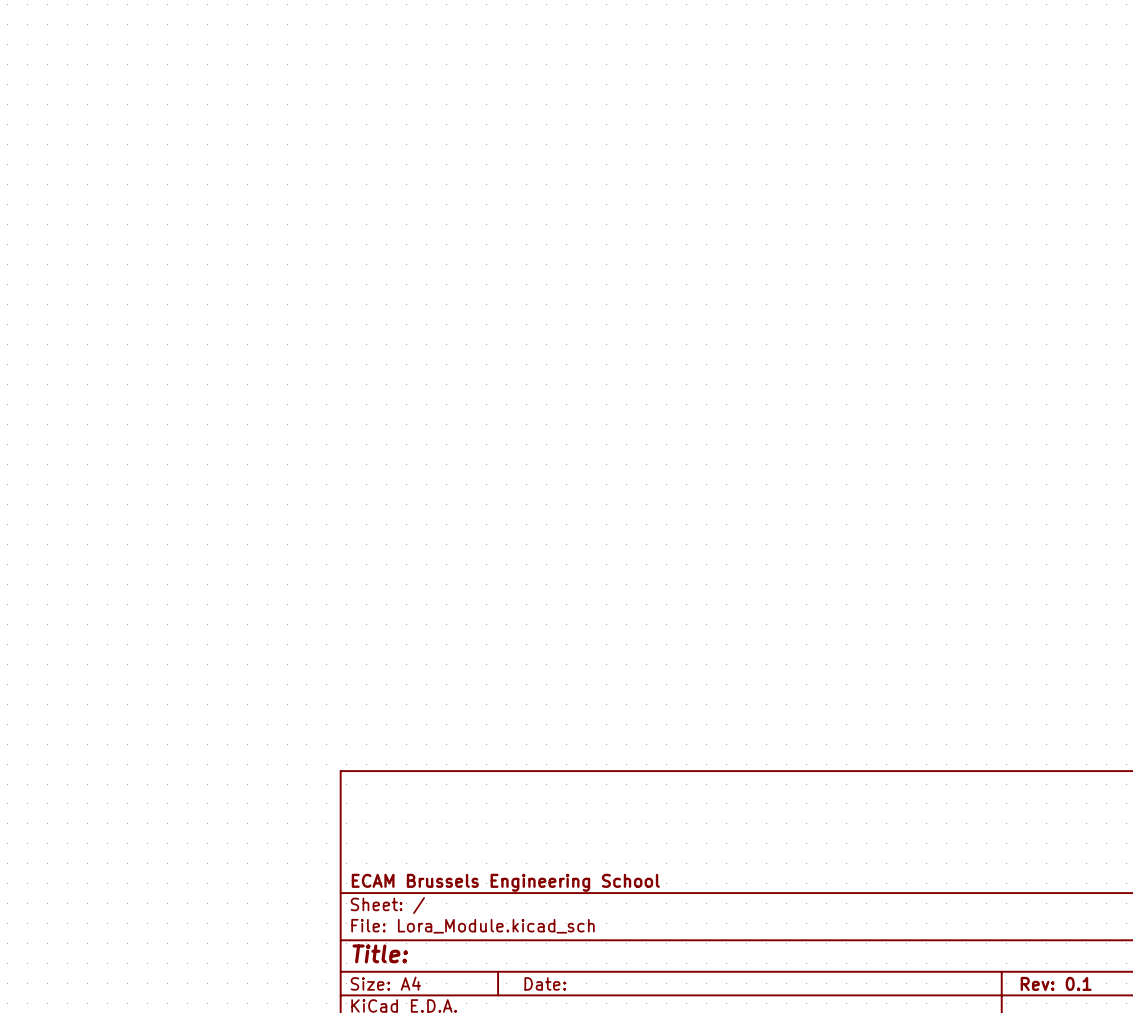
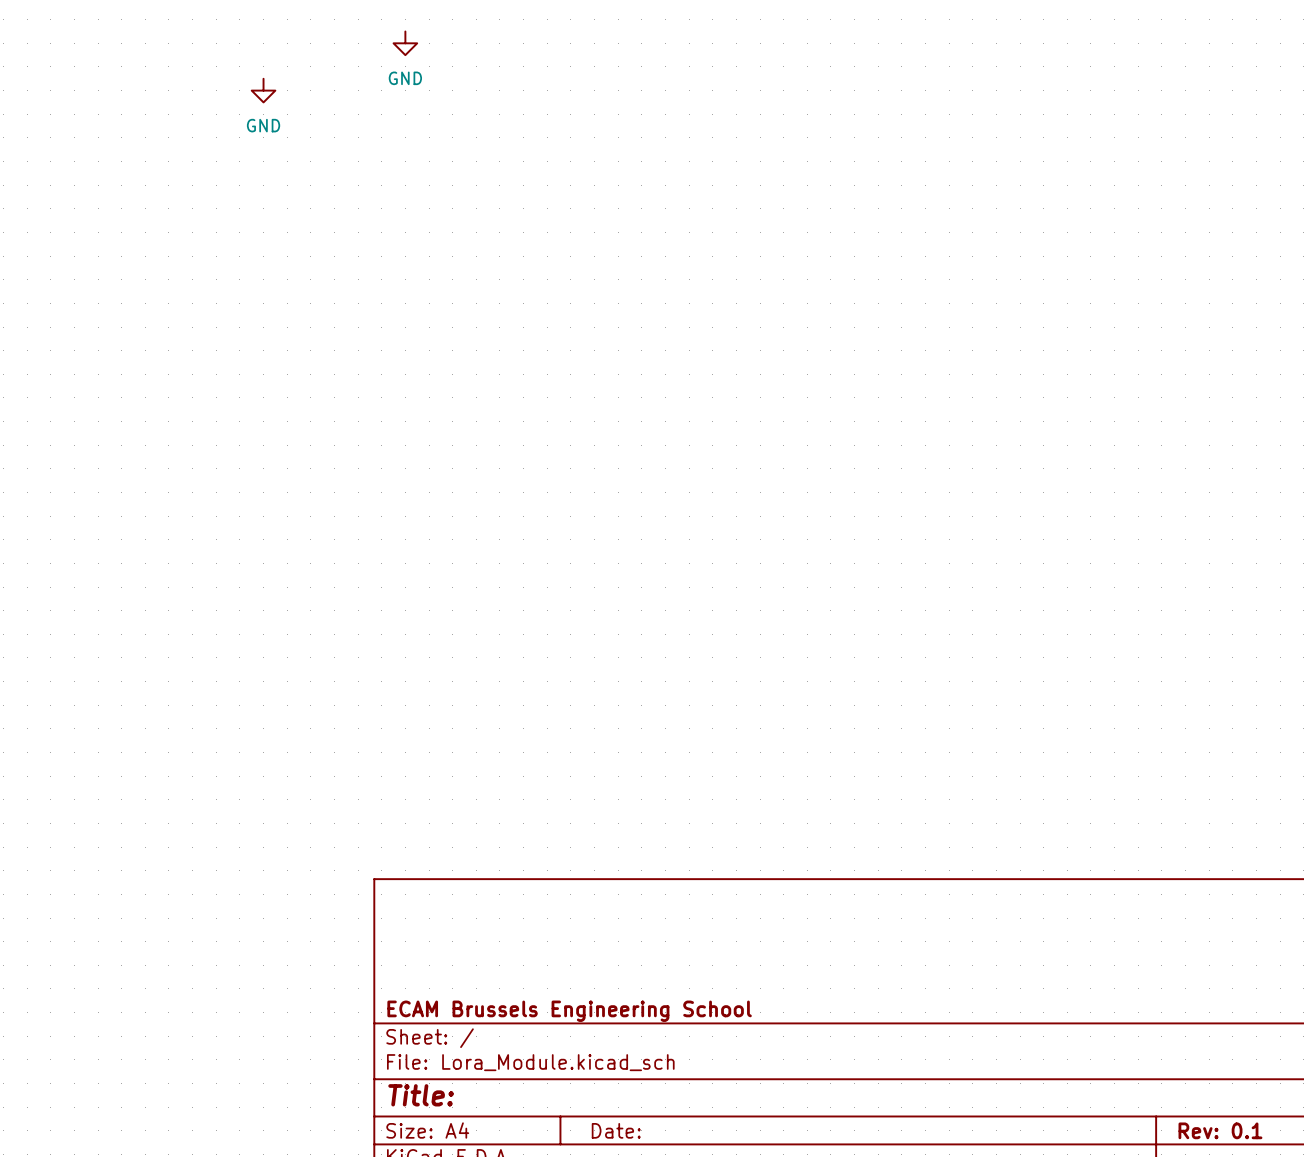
power symbol: none -> GND (405, 43)
power symbol: none -> GND (263, 90)

